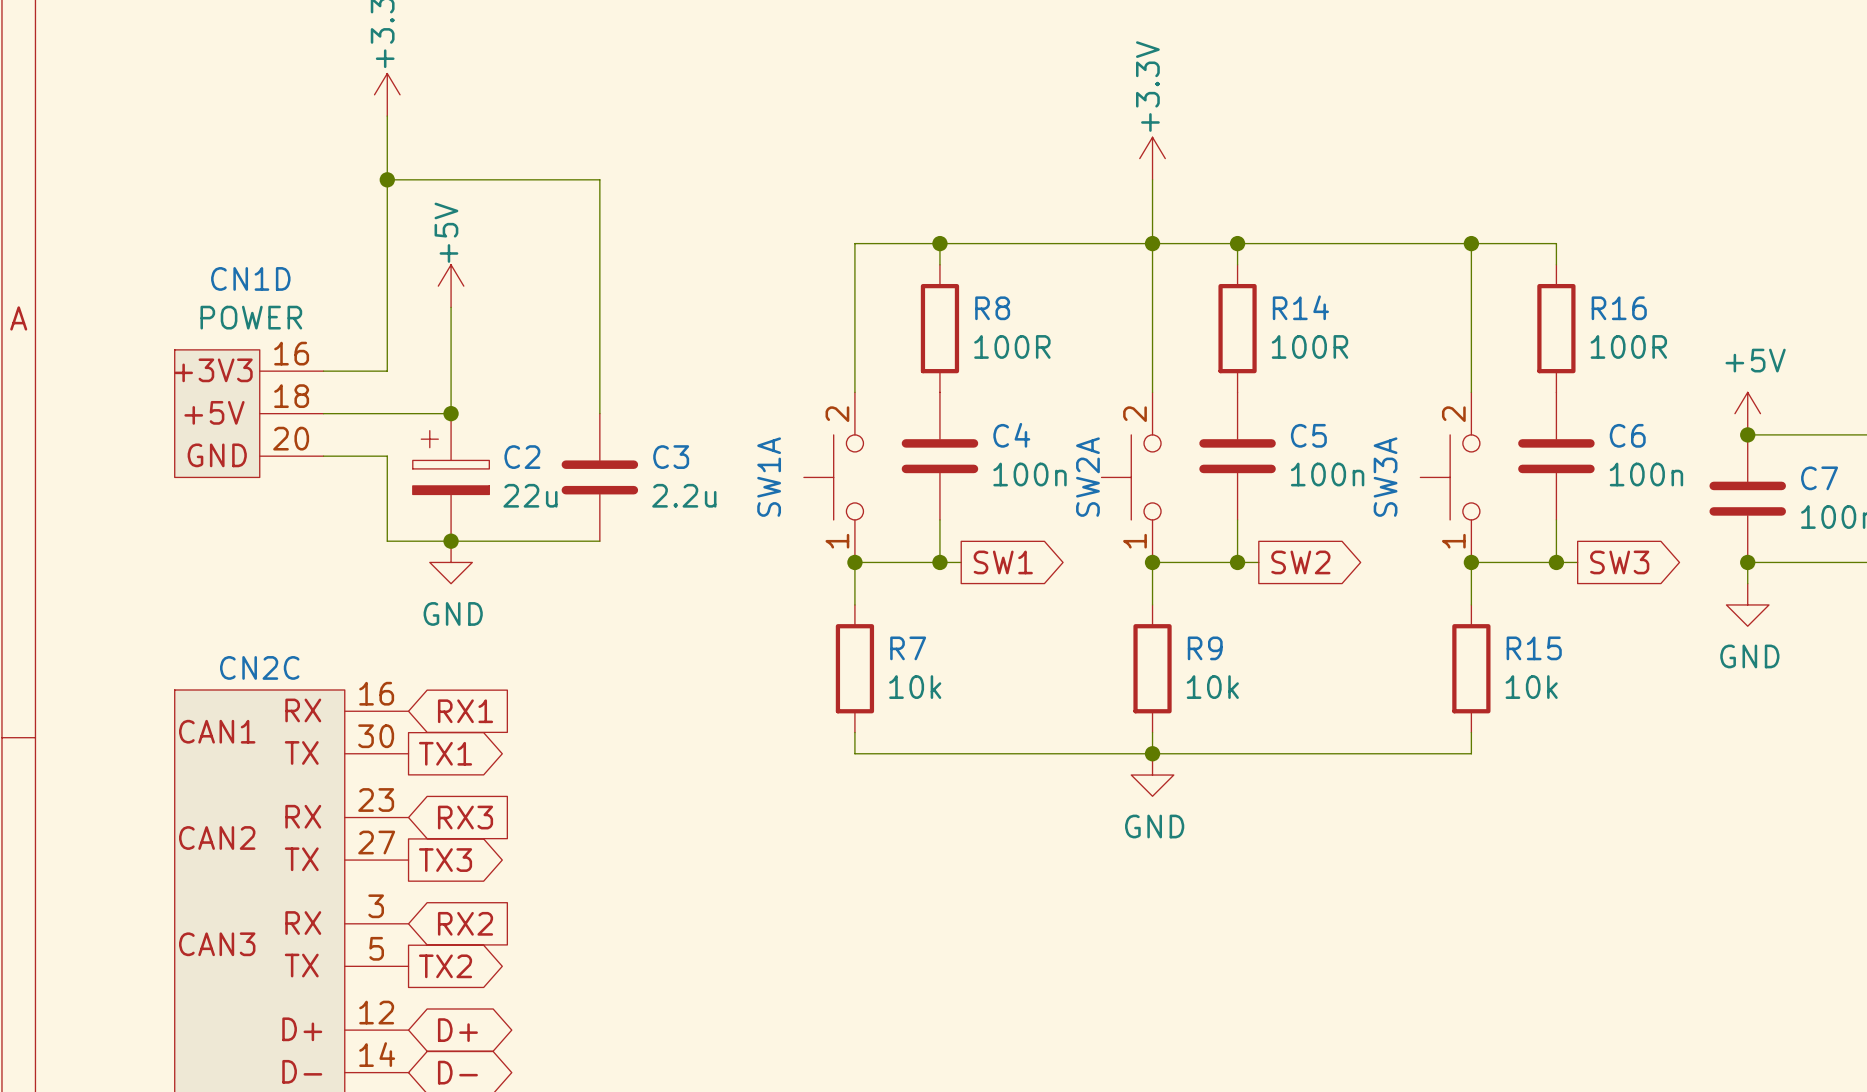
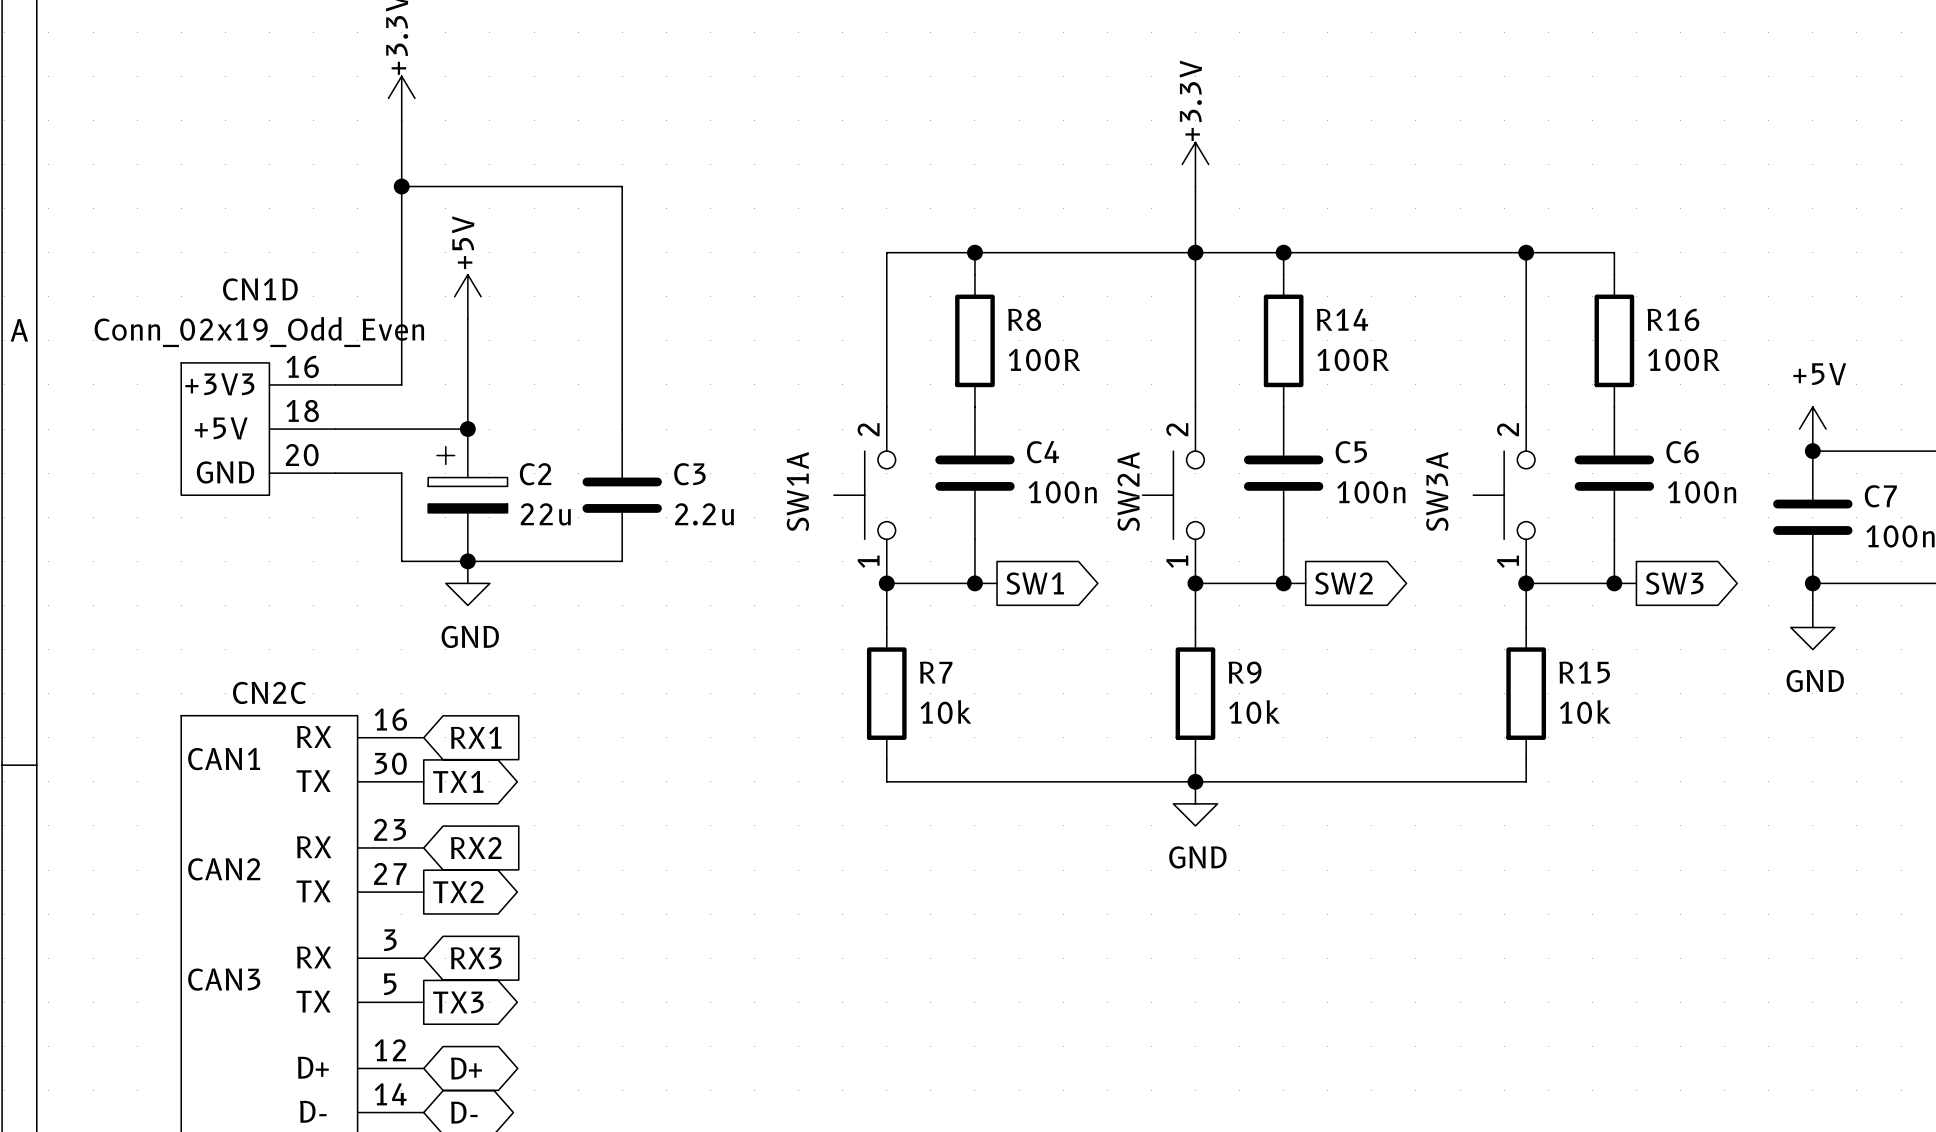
CN1D value: POWER (251, 317) -> Conn_02x19_Odd_Even (259, 332)
global label: RX3 (465, 817) -> RX2 (476, 847)
global label: TX3 (445, 860) -> TX2 (458, 892)
global label: RX2 (465, 923) -> RX3 (476, 958)
global label: TX2 (445, 966) -> TX3 (458, 1002)

